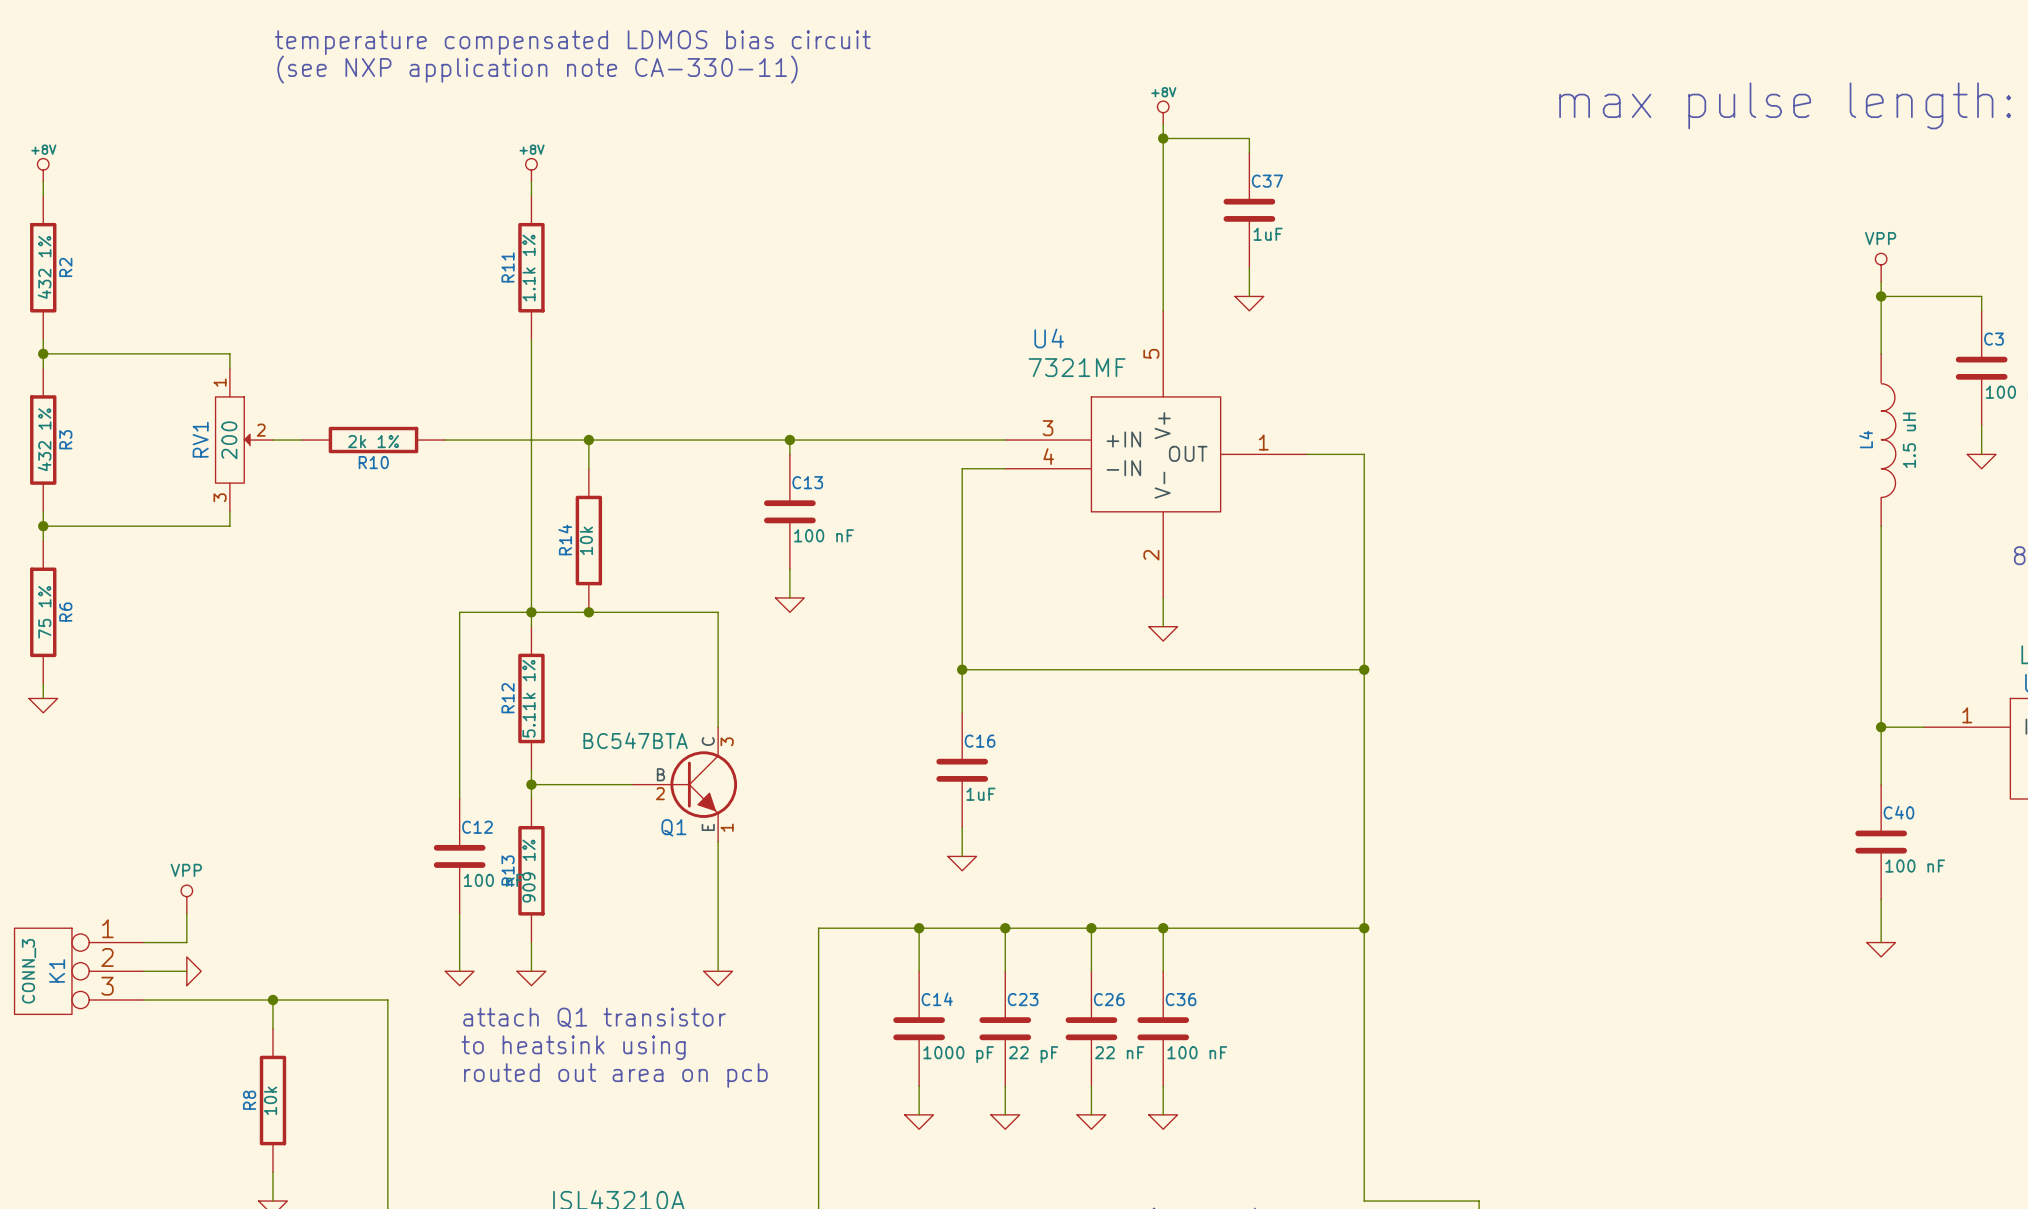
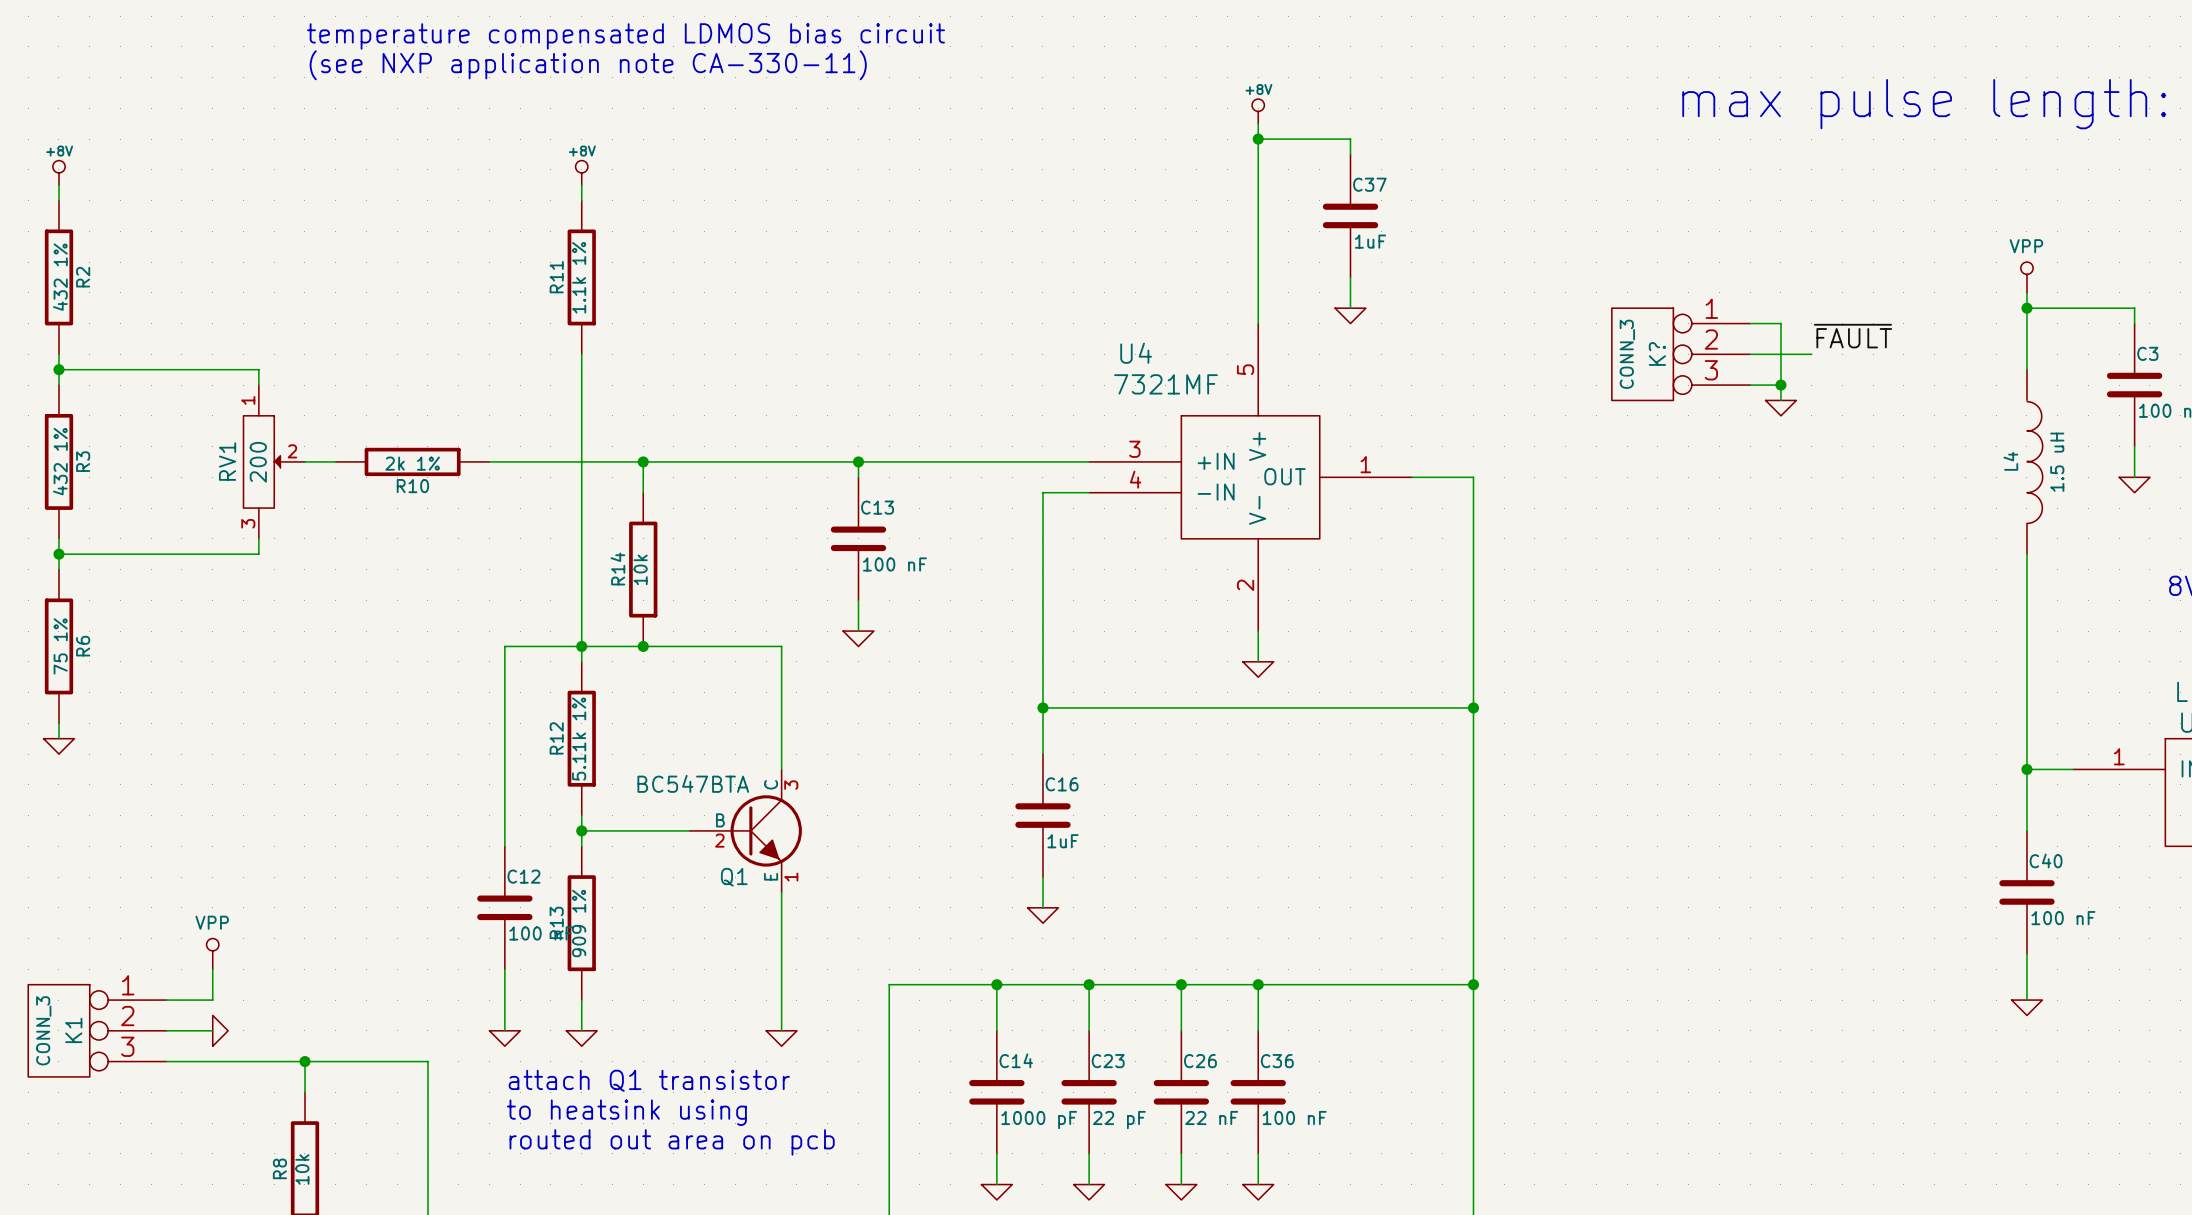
wire: none -> (1750, 323) (1780, 323) (1780, 400)
label: none -> ~{FAULT} (1852, 336)
K?: none -> CONN_3 (1681, 354)
wire: none -> (1750, 354) (1811, 354)
wire: none -> (1750, 385) (1780, 385)
junction: none -> (1780, 385)
power symbol: none -> (1780, 408)

